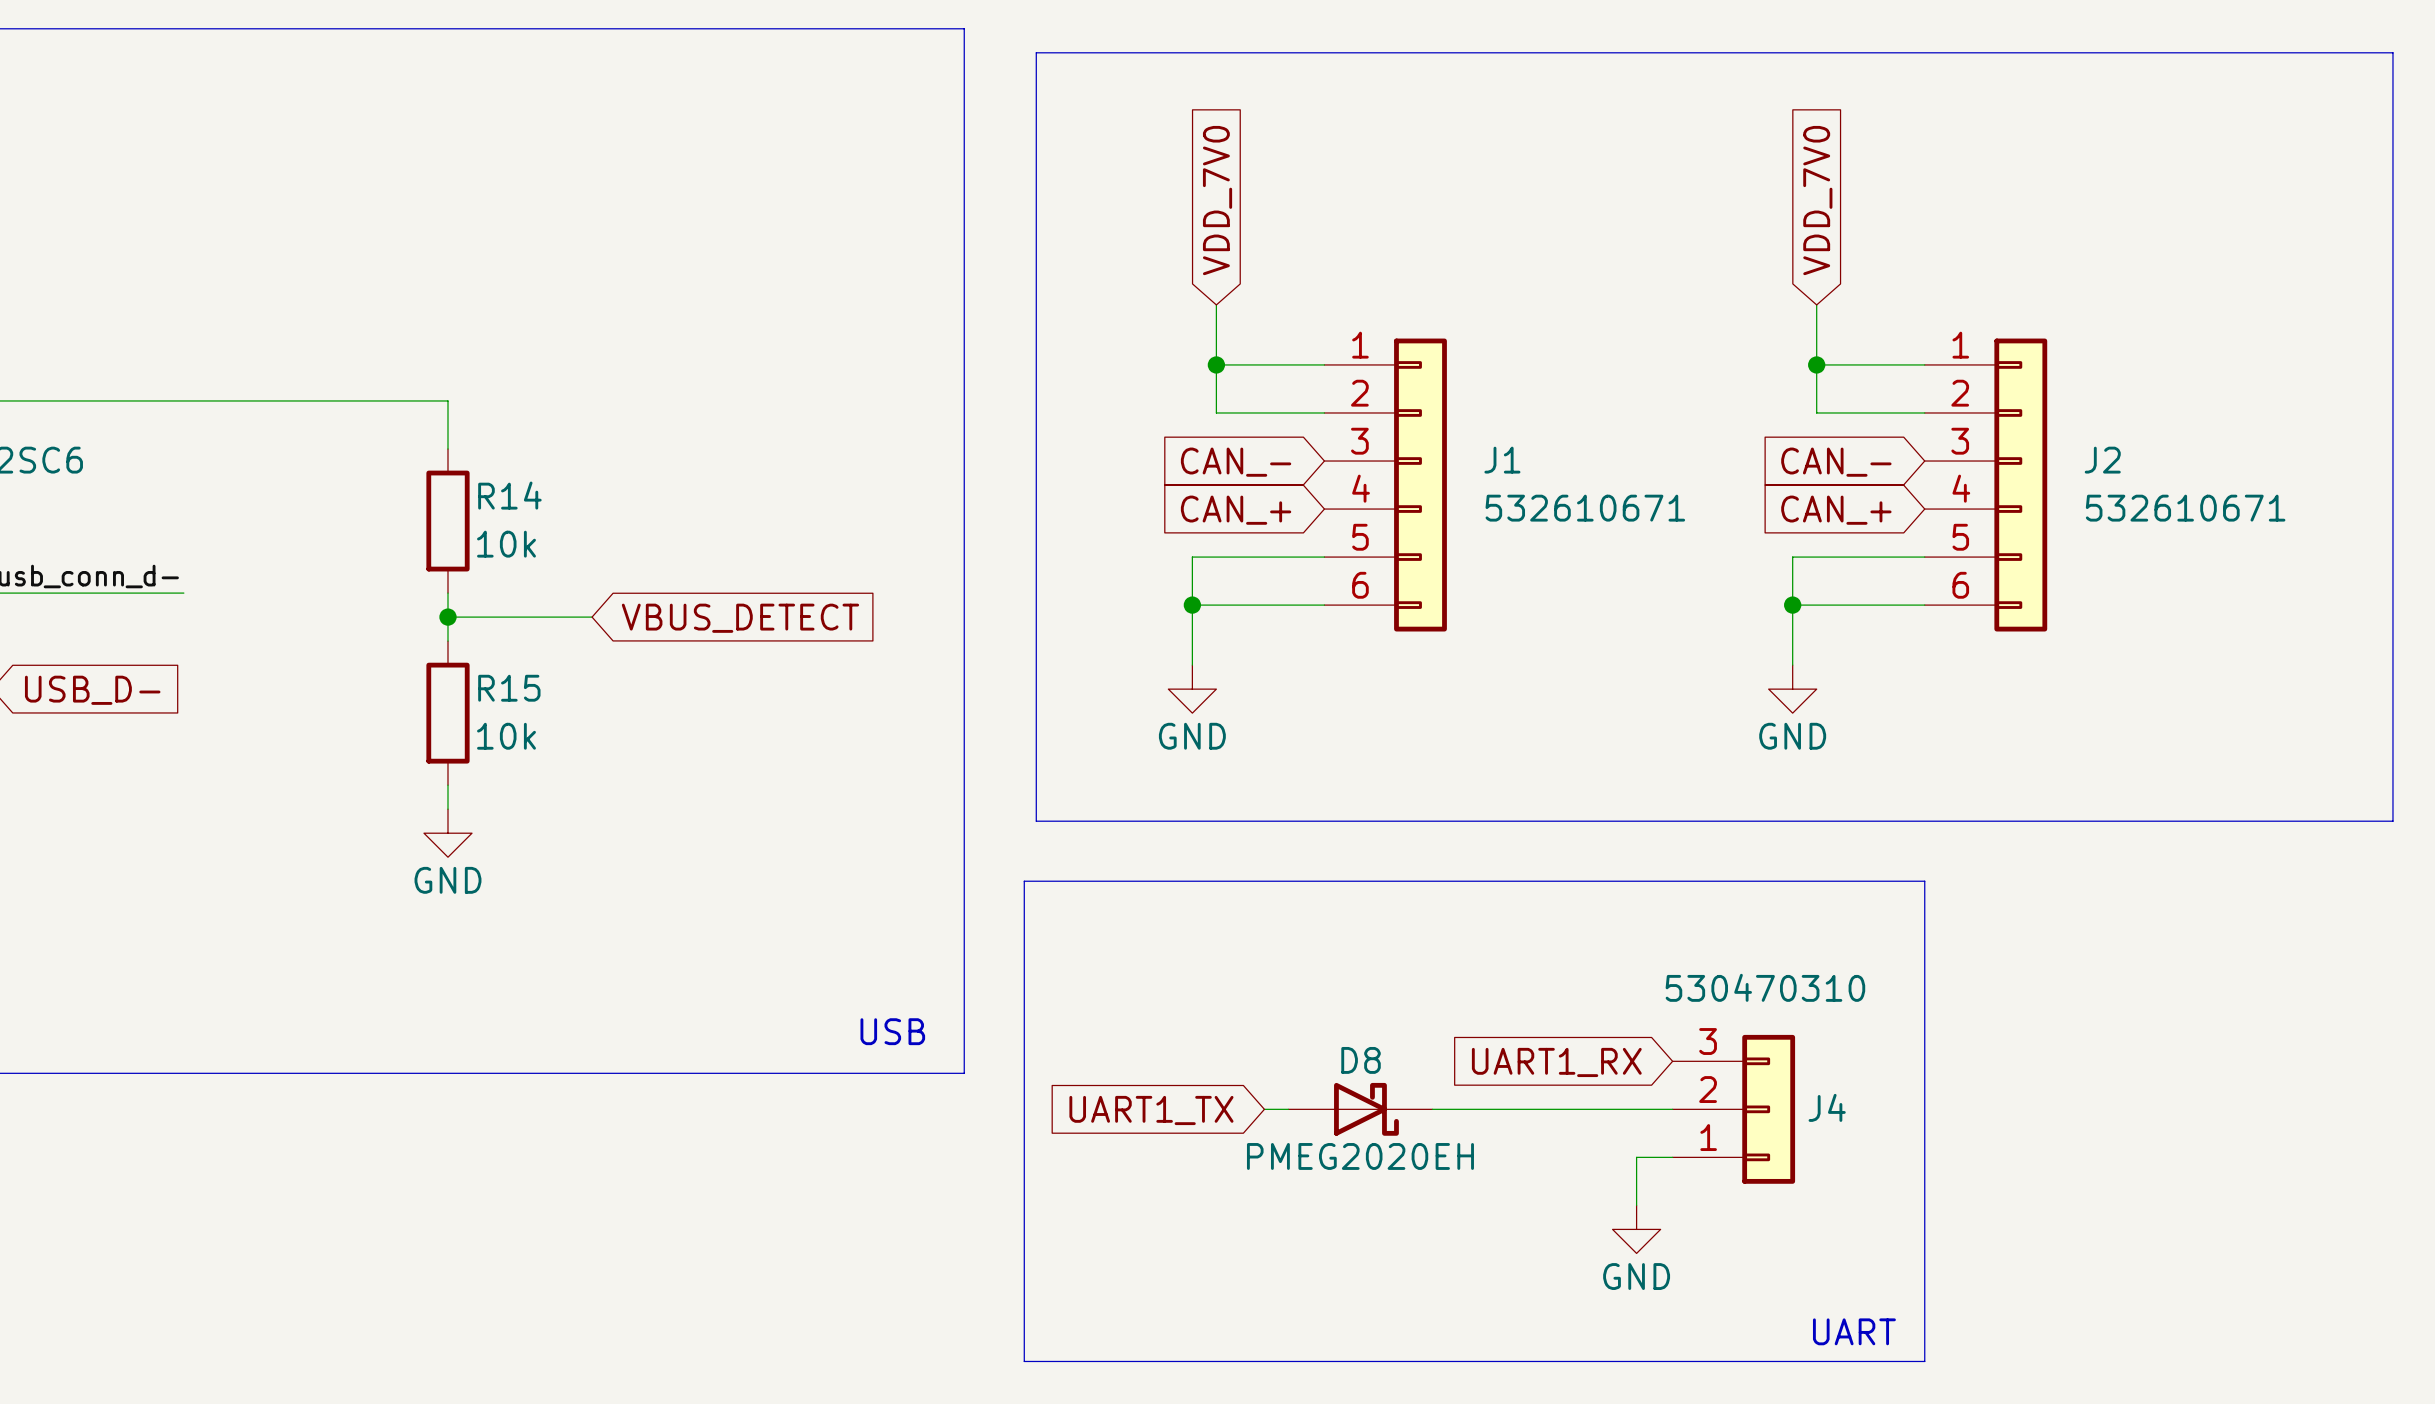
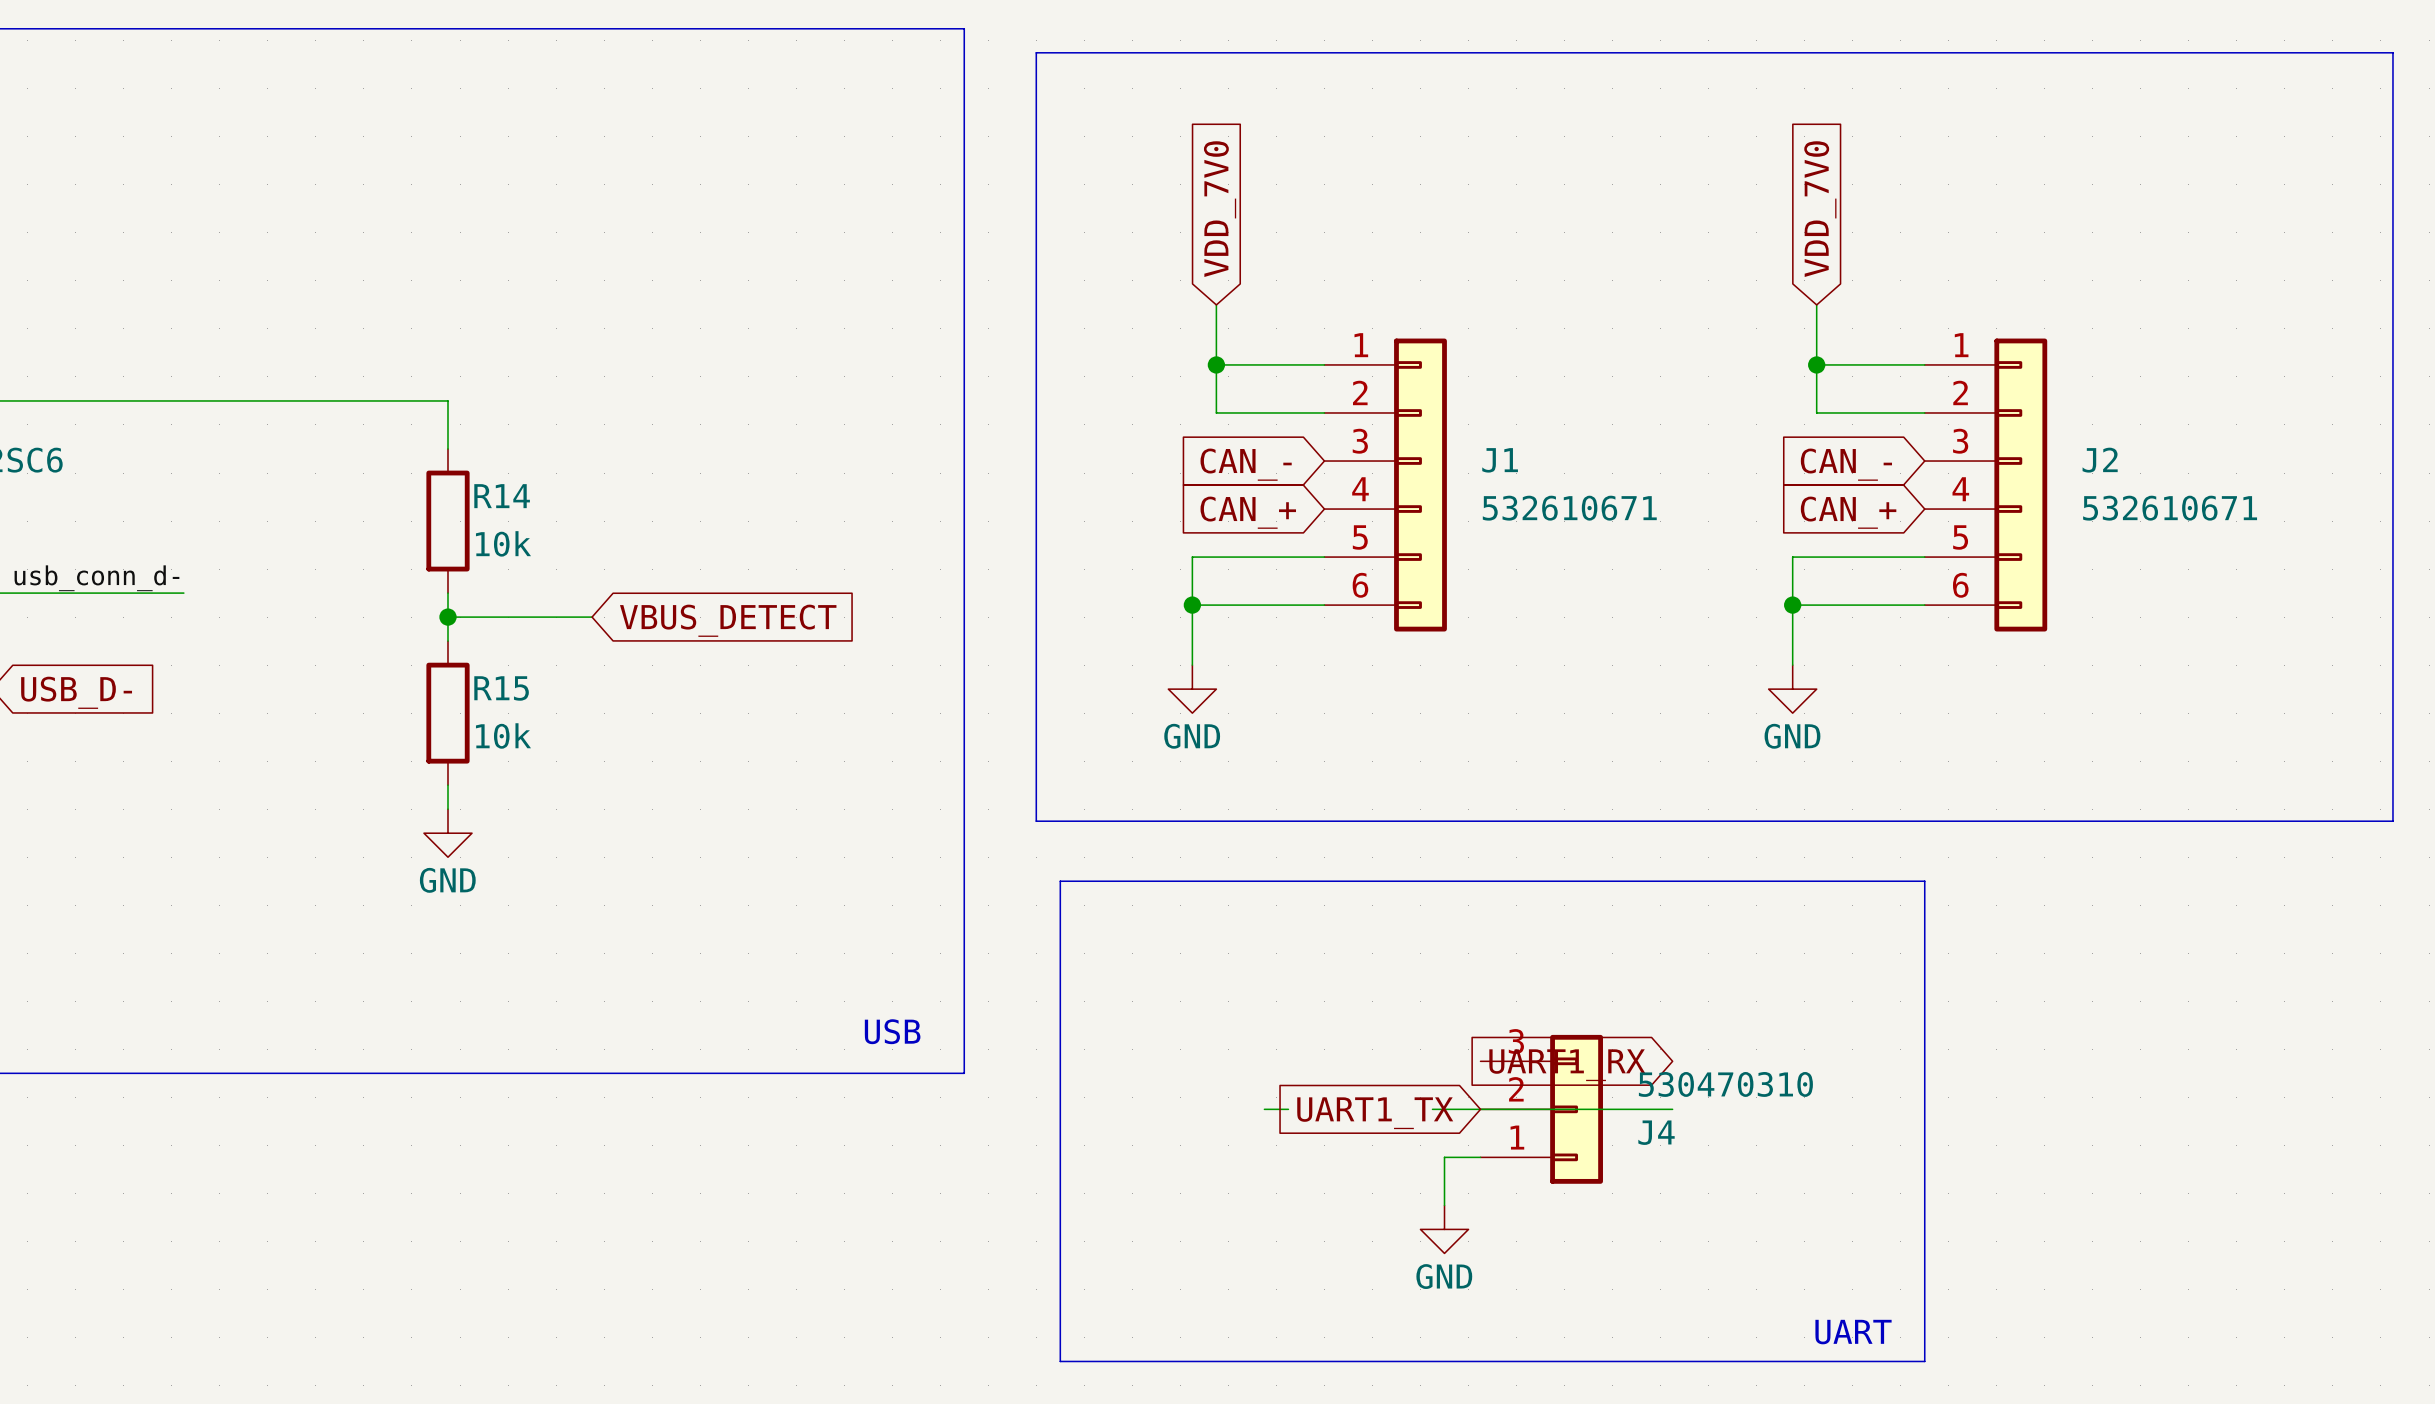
line: (1060, 881) (1024, 881) (1024, 1361) (1060, 1361) -> (1060, 881) (1060, 1361)
J4 value position: 530470310 (1765, 987) -> 530470310 (1725, 1084)
J4 name position: J4 (1827, 1107) -> J4 (1656, 1132)
D8: PMEG2020EH (1360, 1109) -> none
J4 position: (1733, 1109) -> (1541, 1109)
global label position: UART1_TX (1151, 1110) -> UART1_TX (1375, 1113)
wire: (1672, 1157) (1636, 1157) (1636, 1205) -> (1480, 1157) (1444, 1157) (1444, 1205)
power symbol position: GND (1636, 1229) -> GND (1444, 1229)

